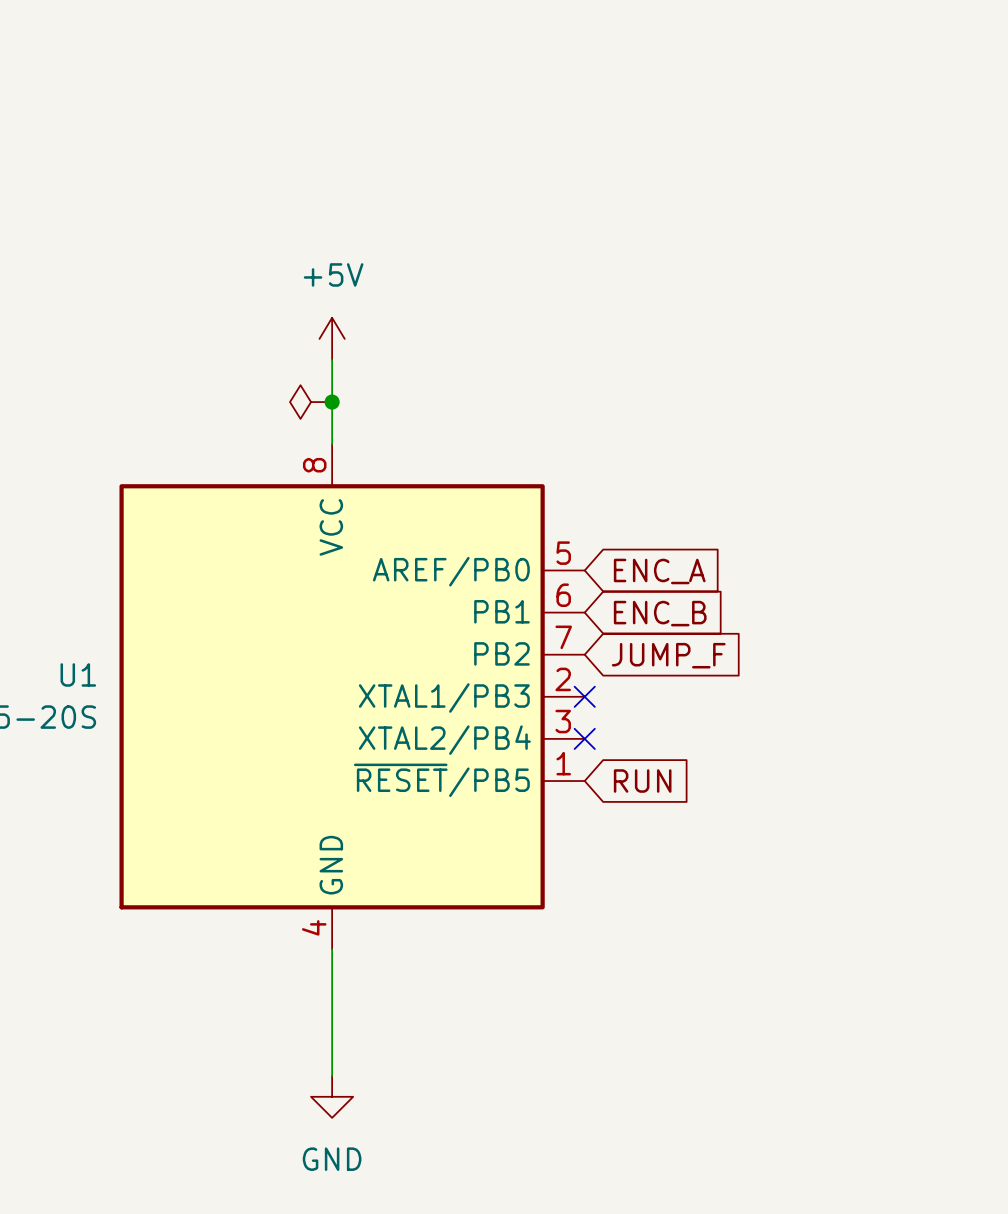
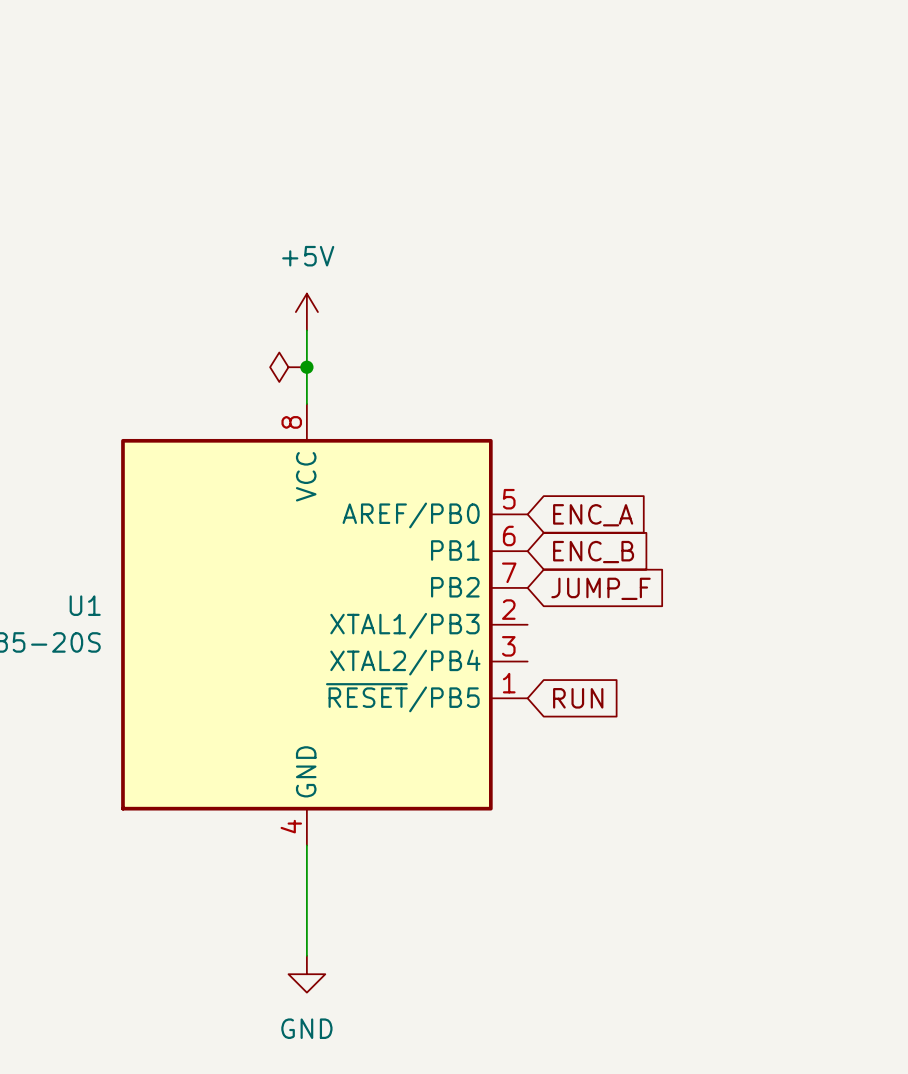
no-connect mark: (584, 696) -> none
no-connect mark: (584, 738) -> none

